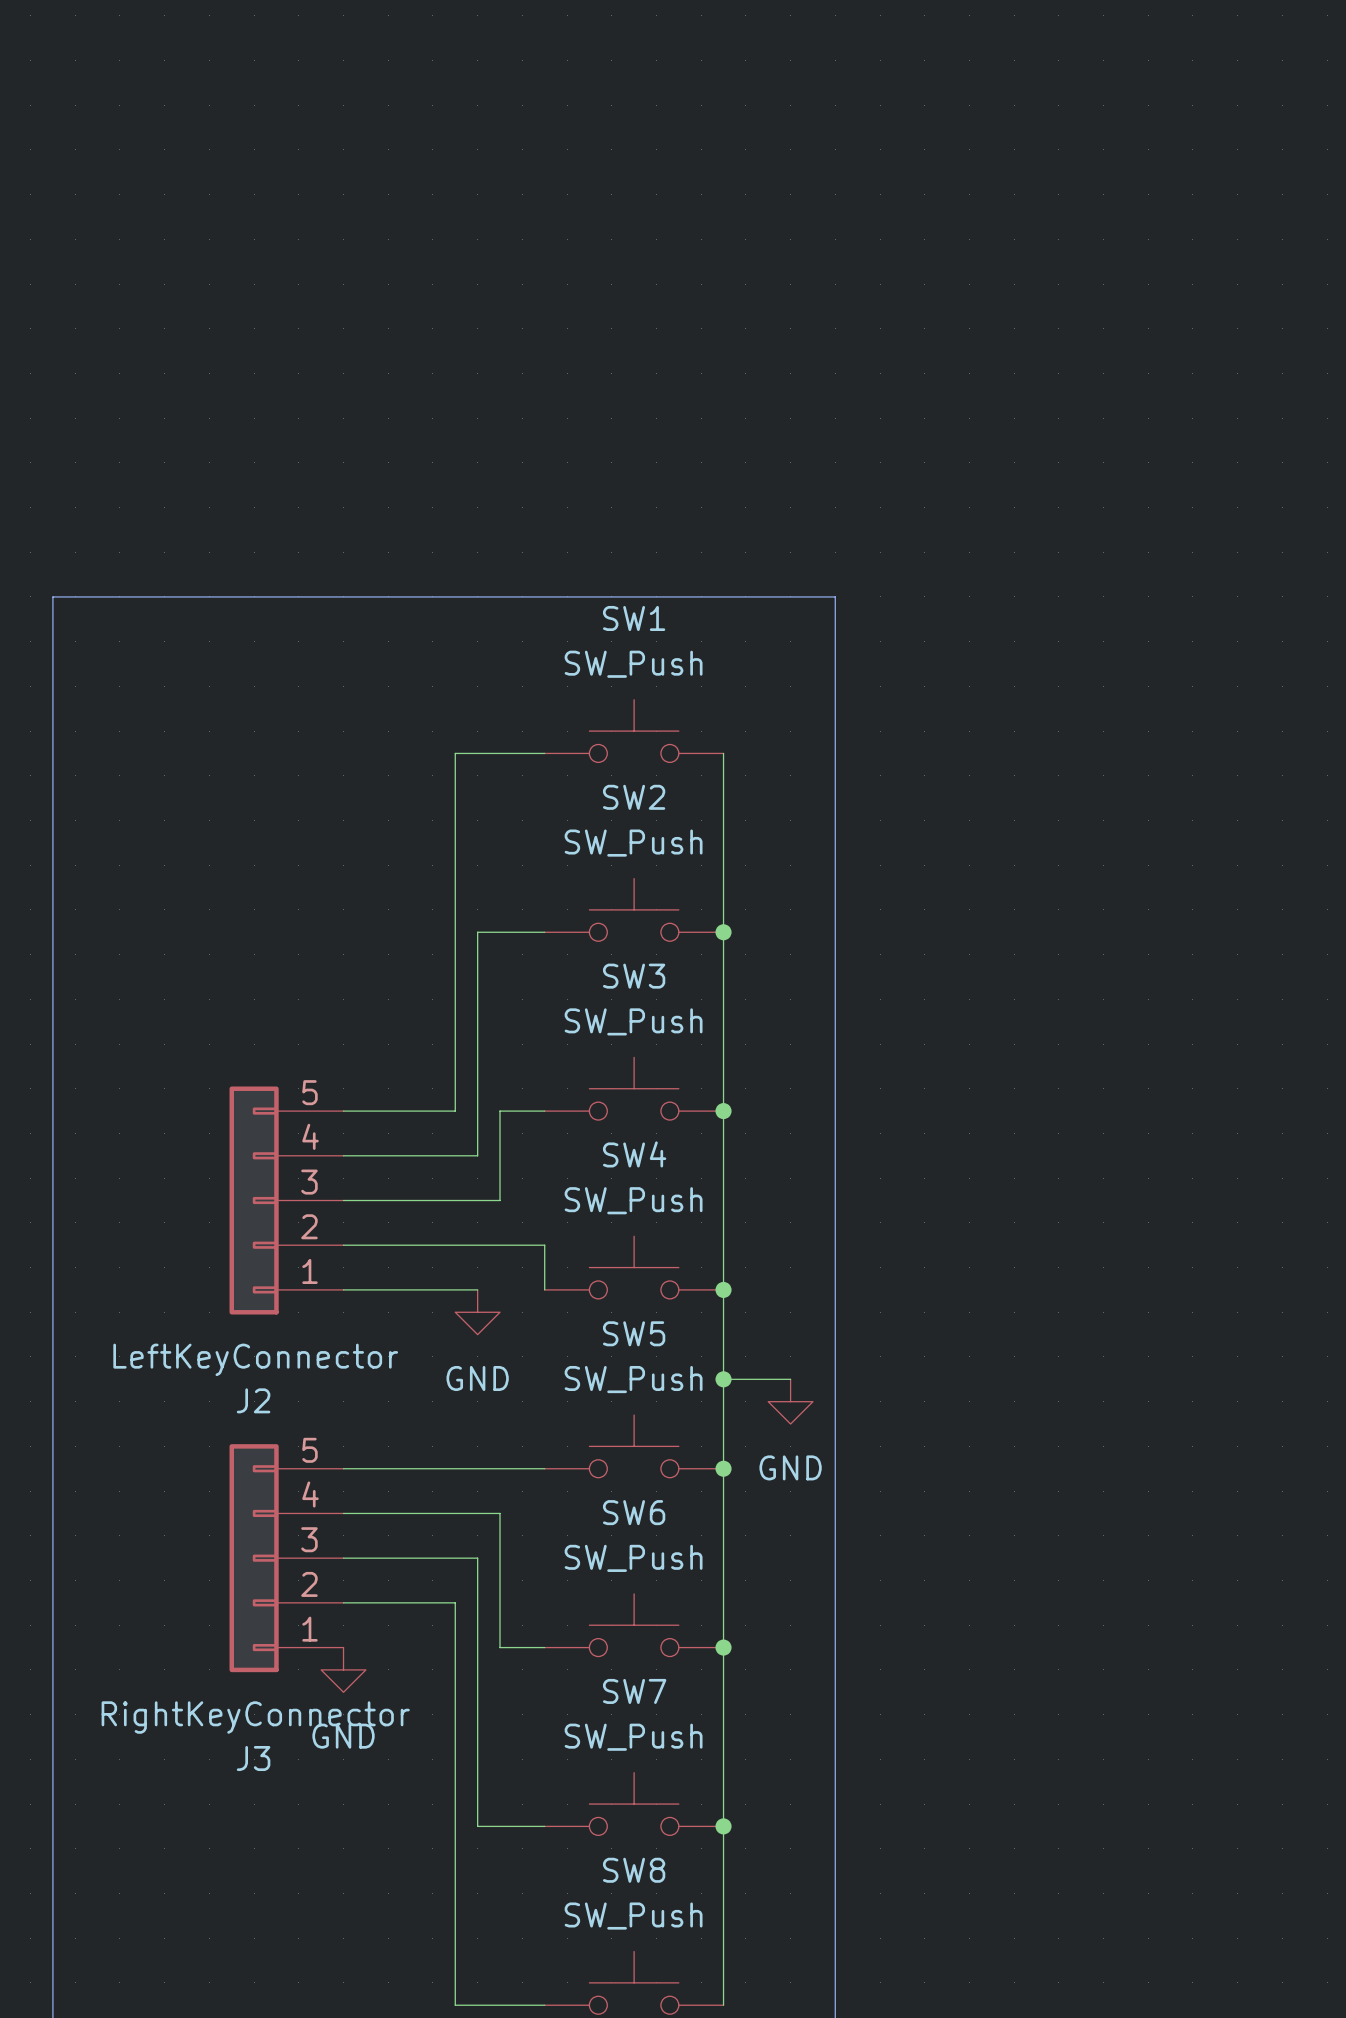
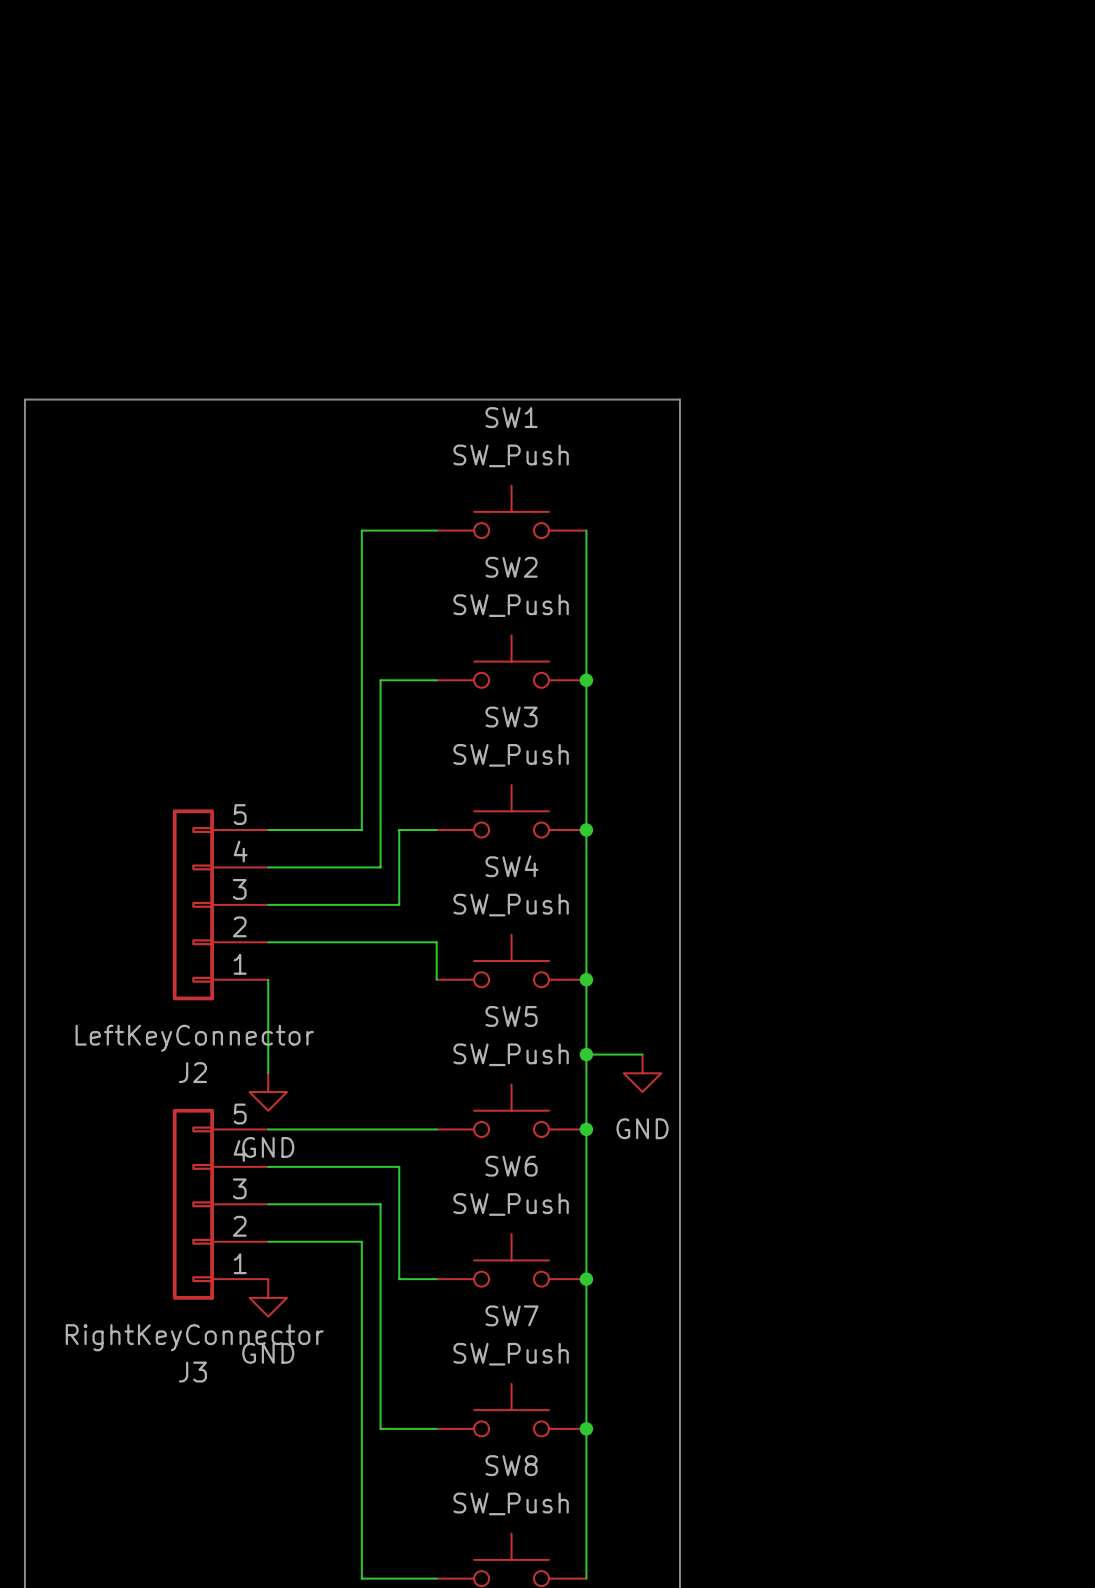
wire: (343, 1289) (477, 1289) -> (268, 979) (268, 1073)
power symbol position: GND (477, 1312) -> GND (268, 1092)

